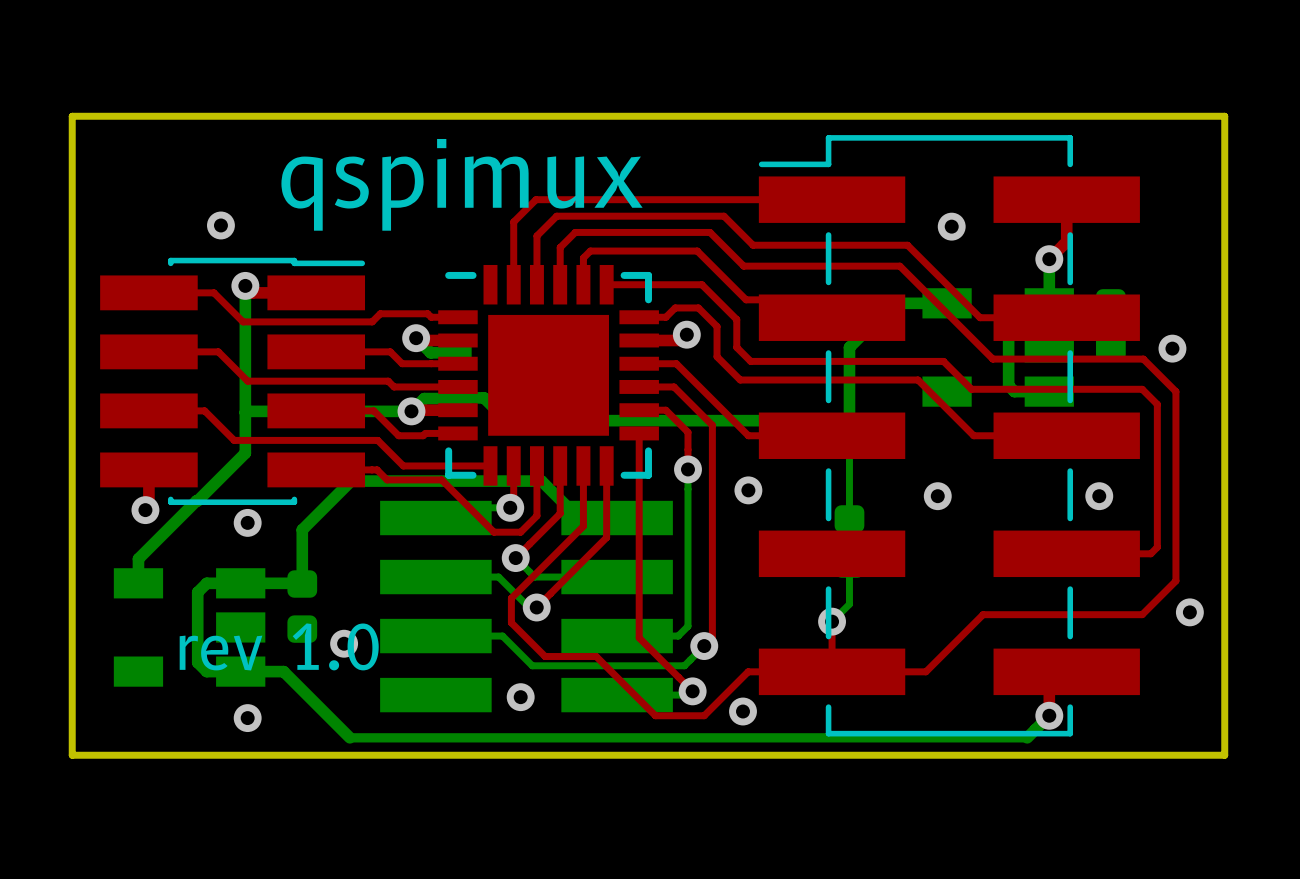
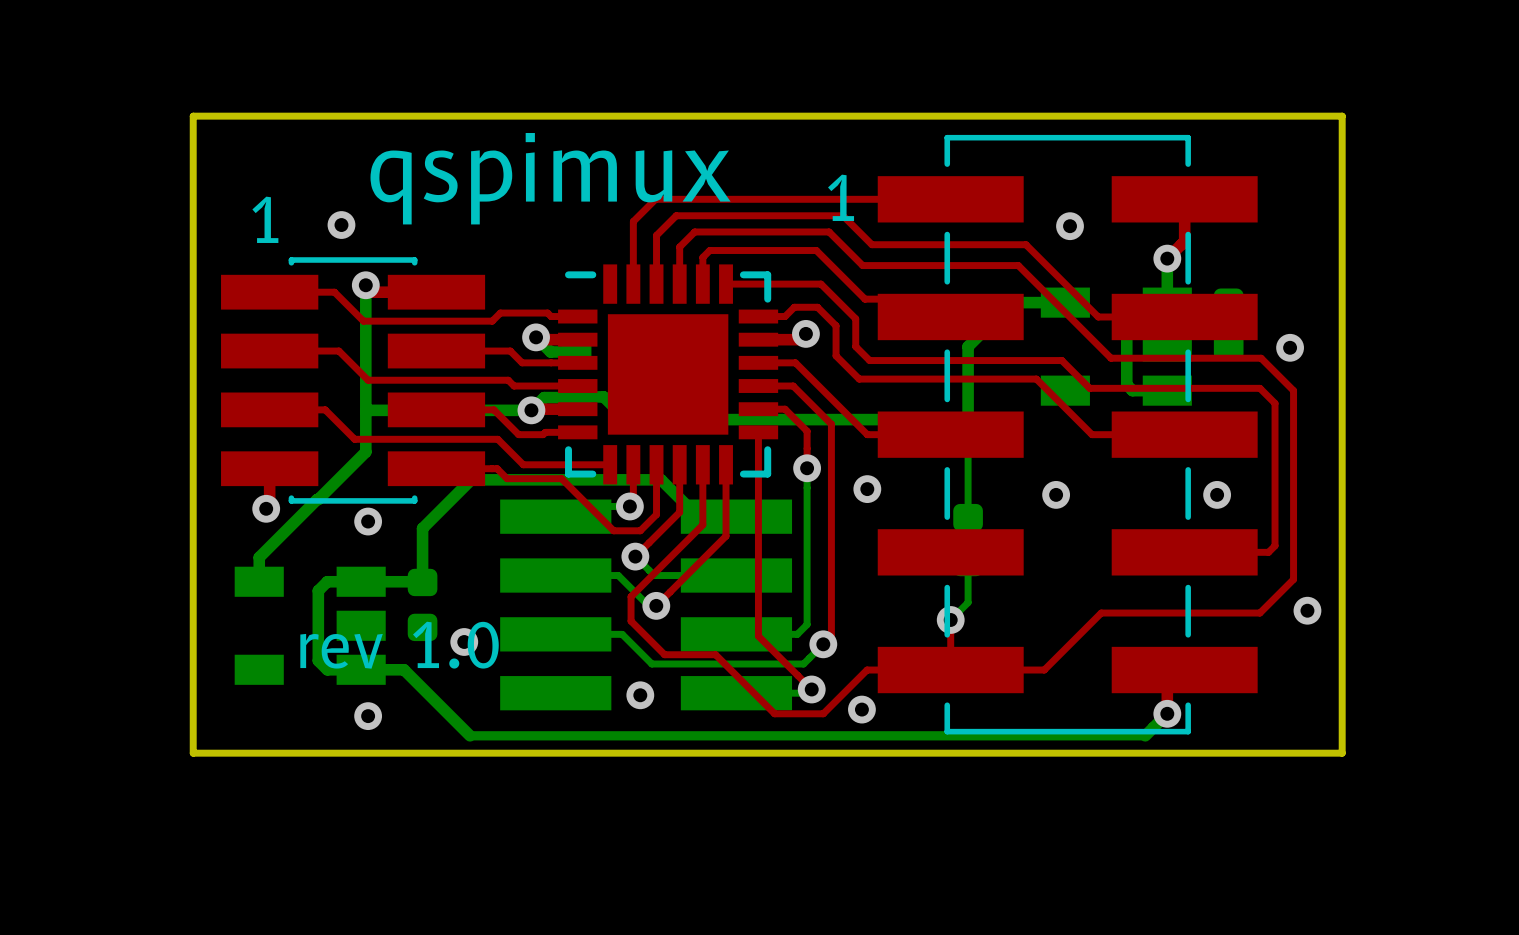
part footprint: [758, 135, 1140, 737] -> [877, 134, 1258, 735]
text position: qspimux (462, 184) -> qspimux (550, 178)
text: none -> 1 (841, 197)
text: none -> 1 (265, 219)
part footprint: [100, 257, 366, 506] -> [221, 257, 486, 504]

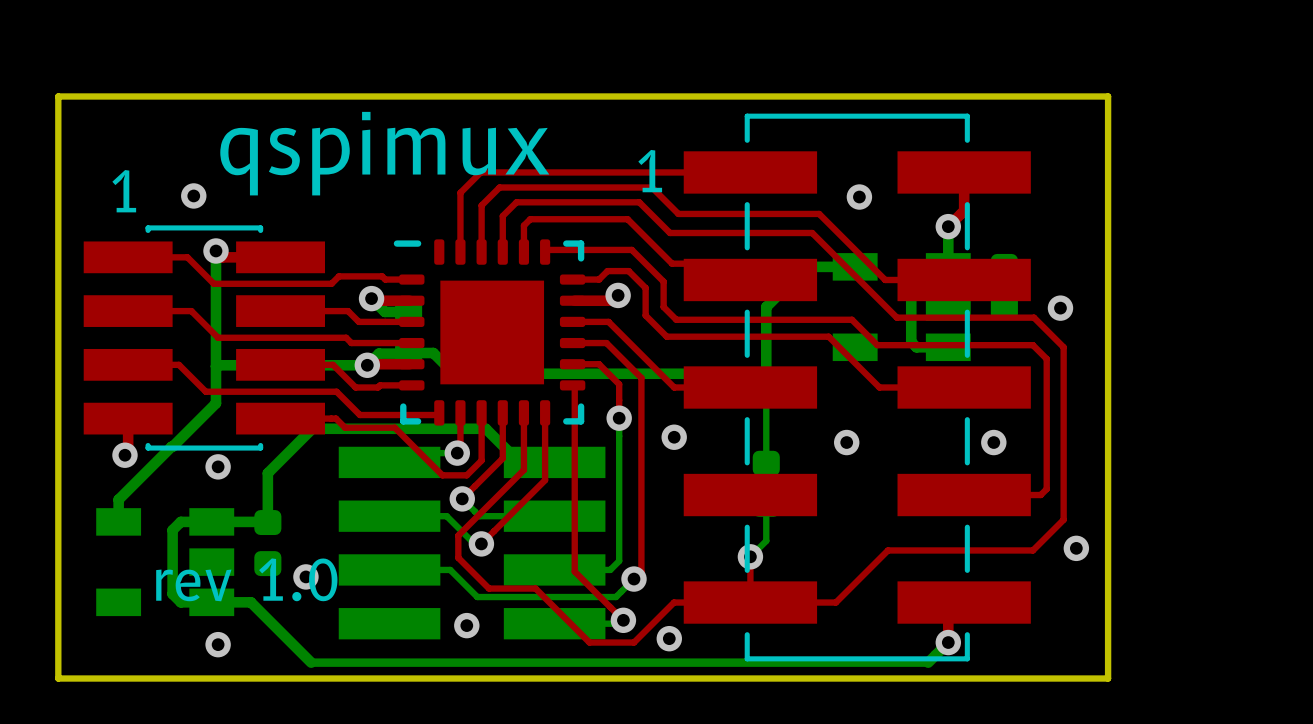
part footprint: [558, 264, 779, 485] -> [393, 239, 586, 426]

